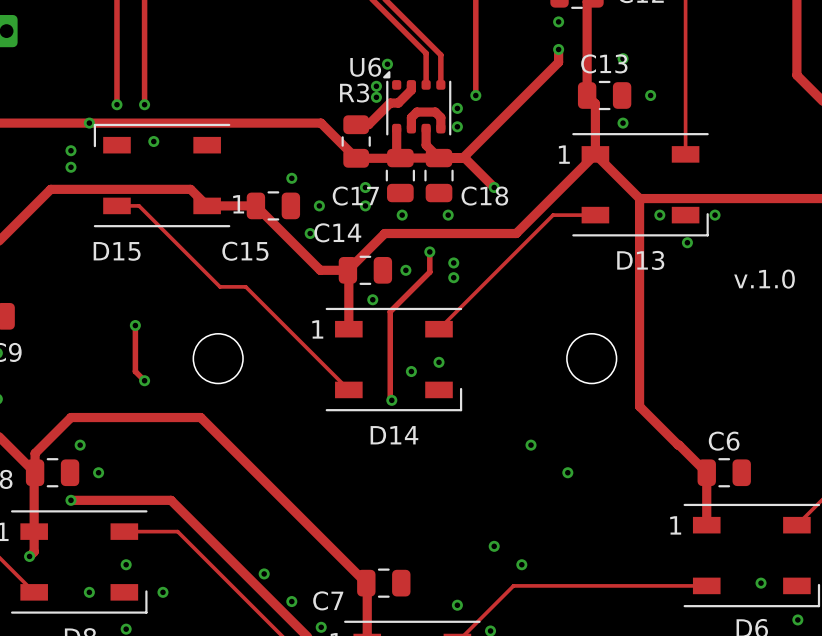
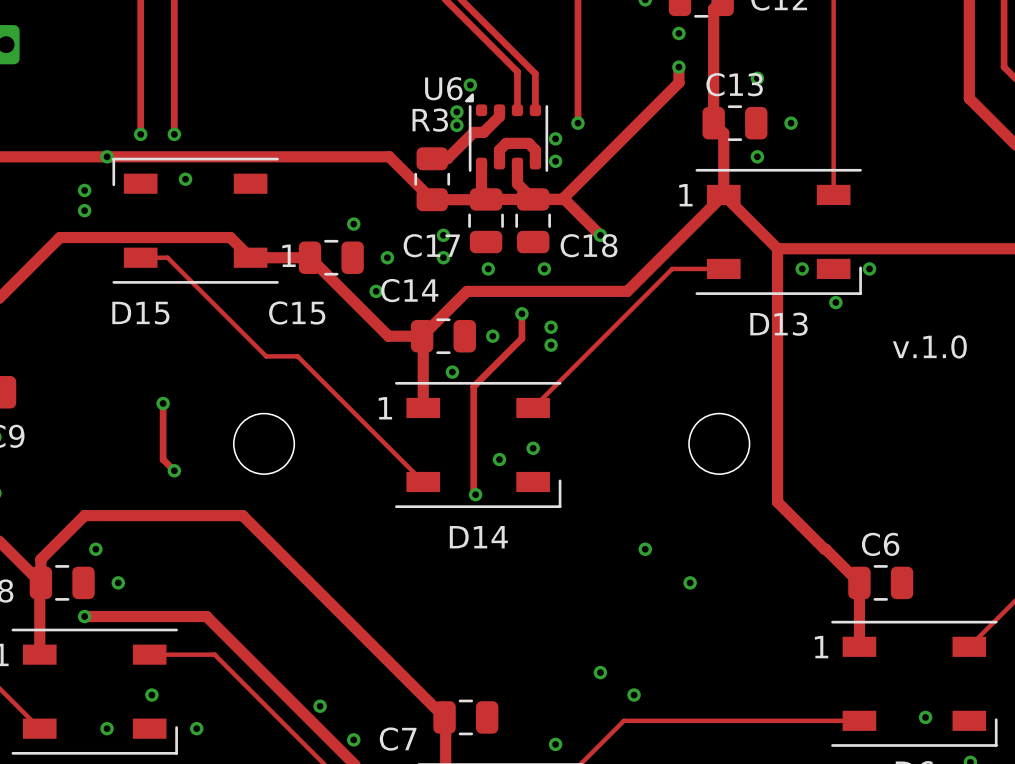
track: (34, 531) (34, 551) (29, 556) -> none
via: (29, 556) -> none

